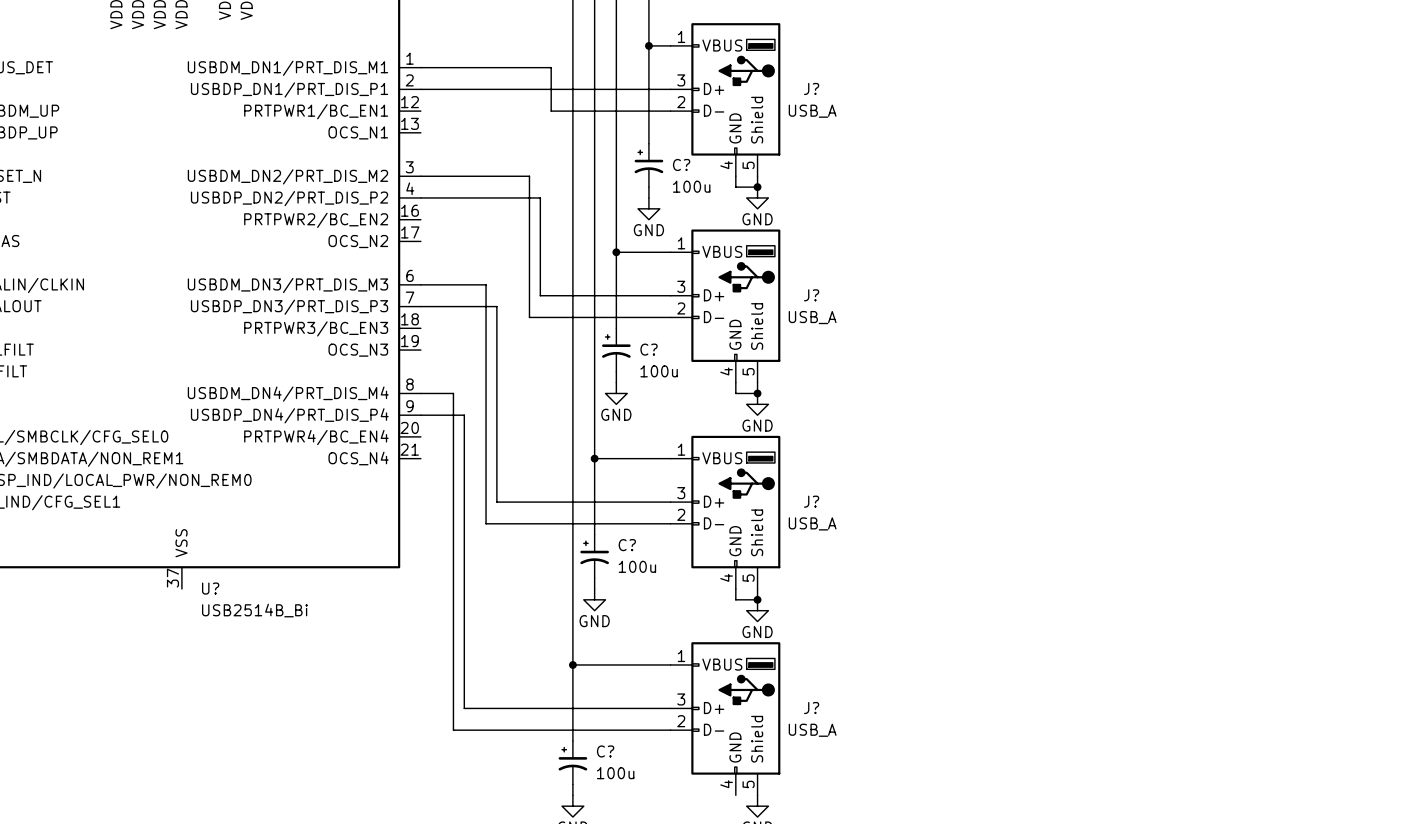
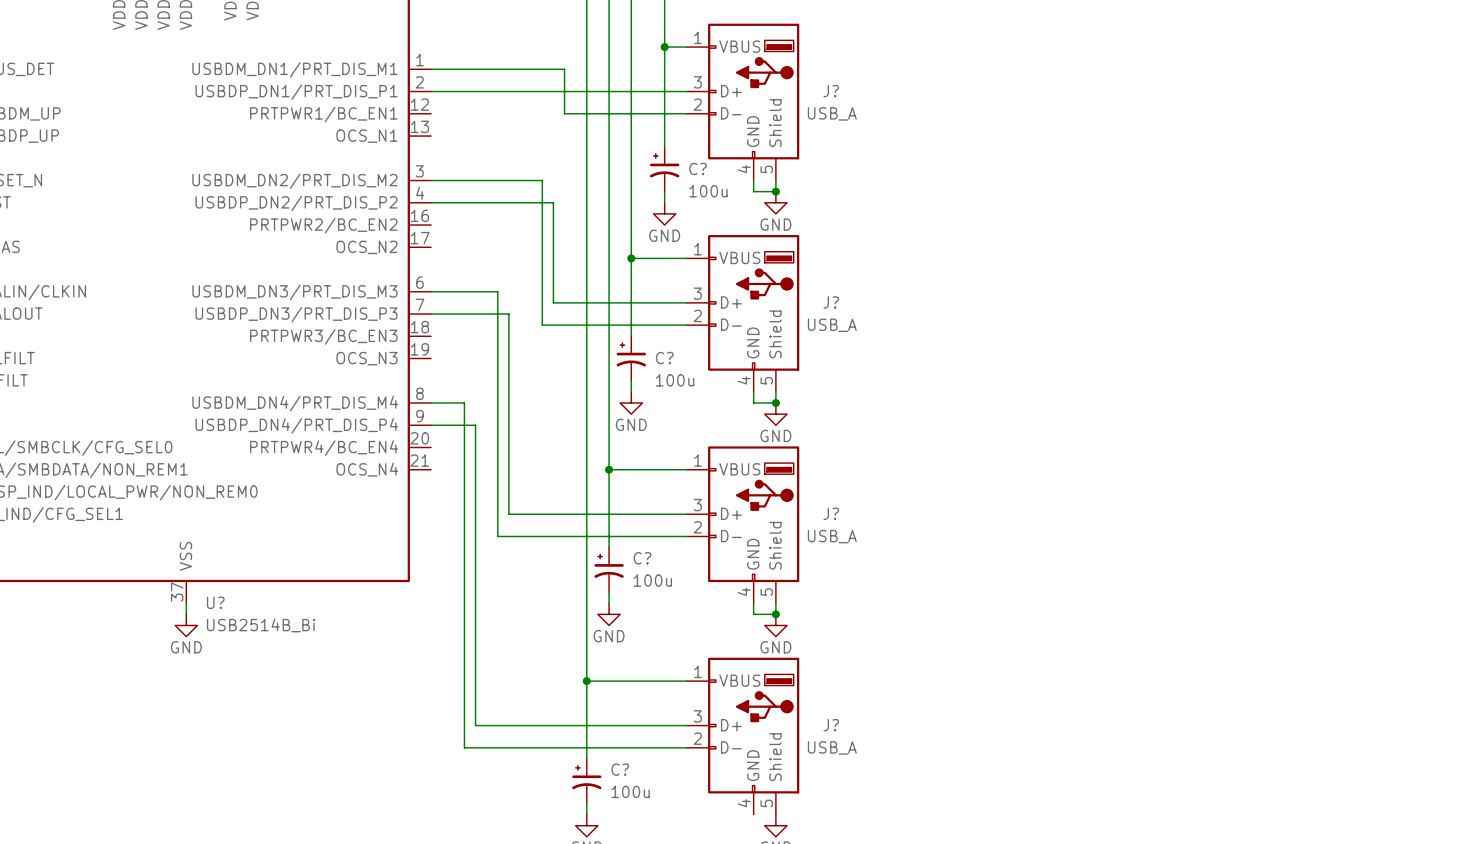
wire: none -> (186, 603) (186, 614)
power symbol: none -> GND (186, 625)

